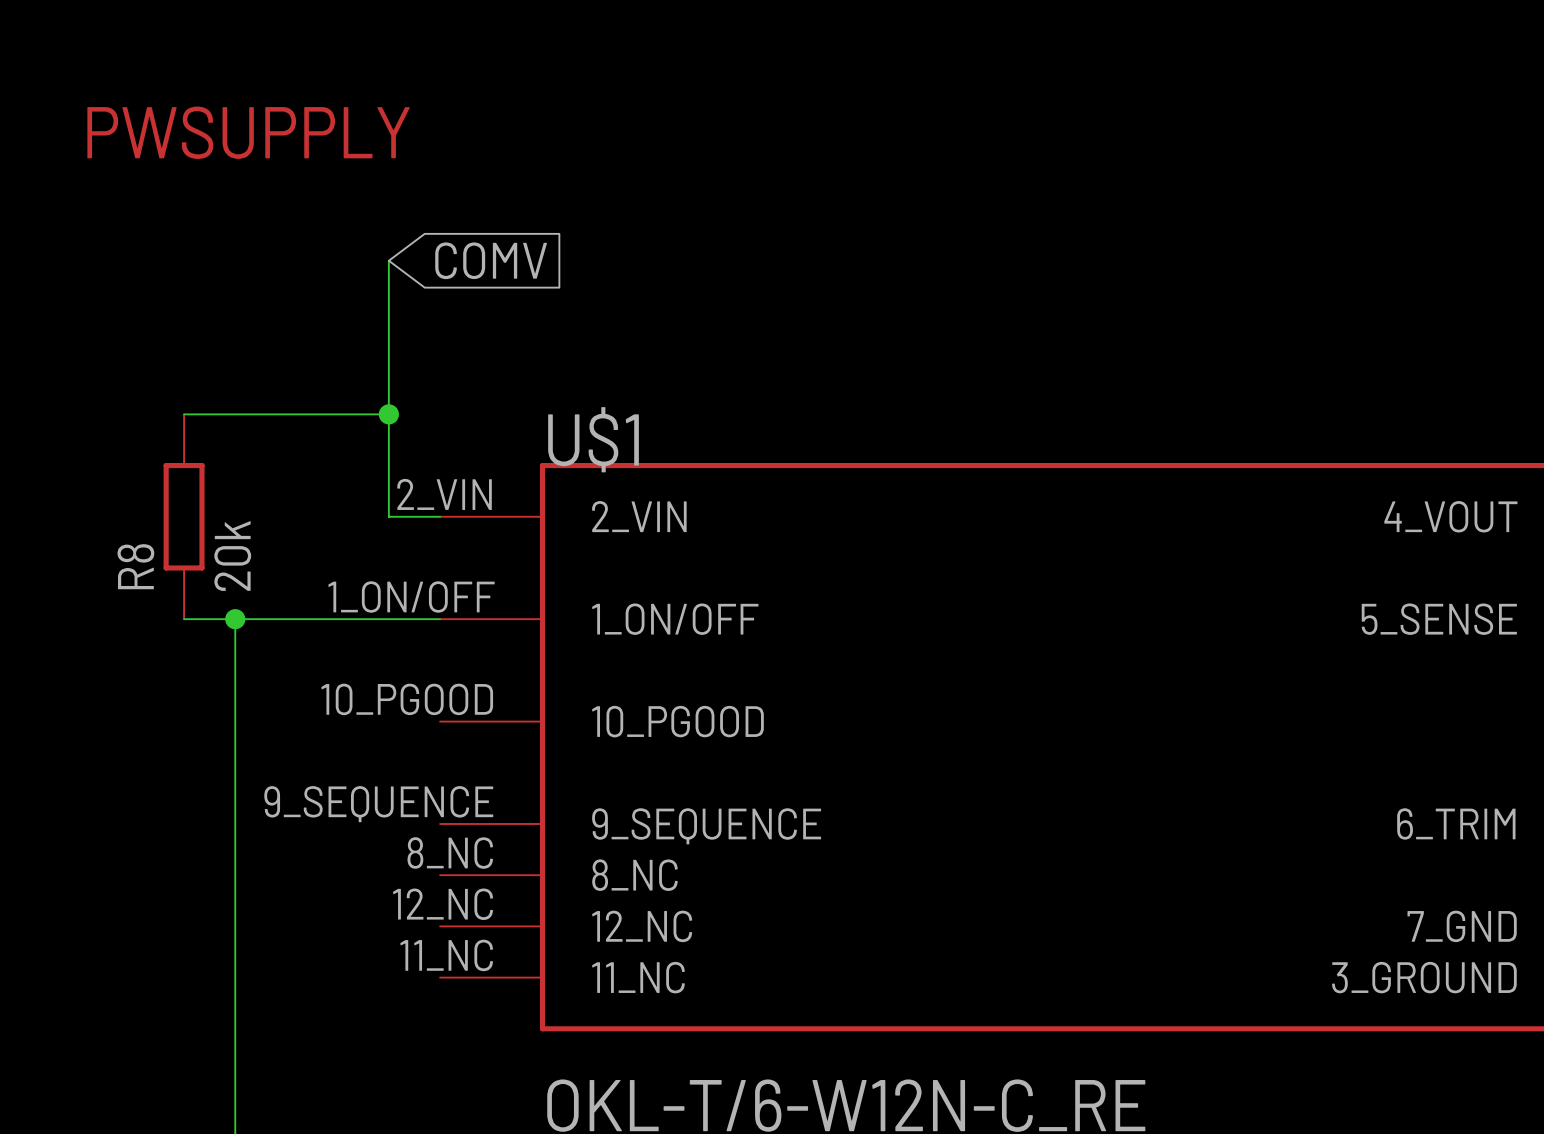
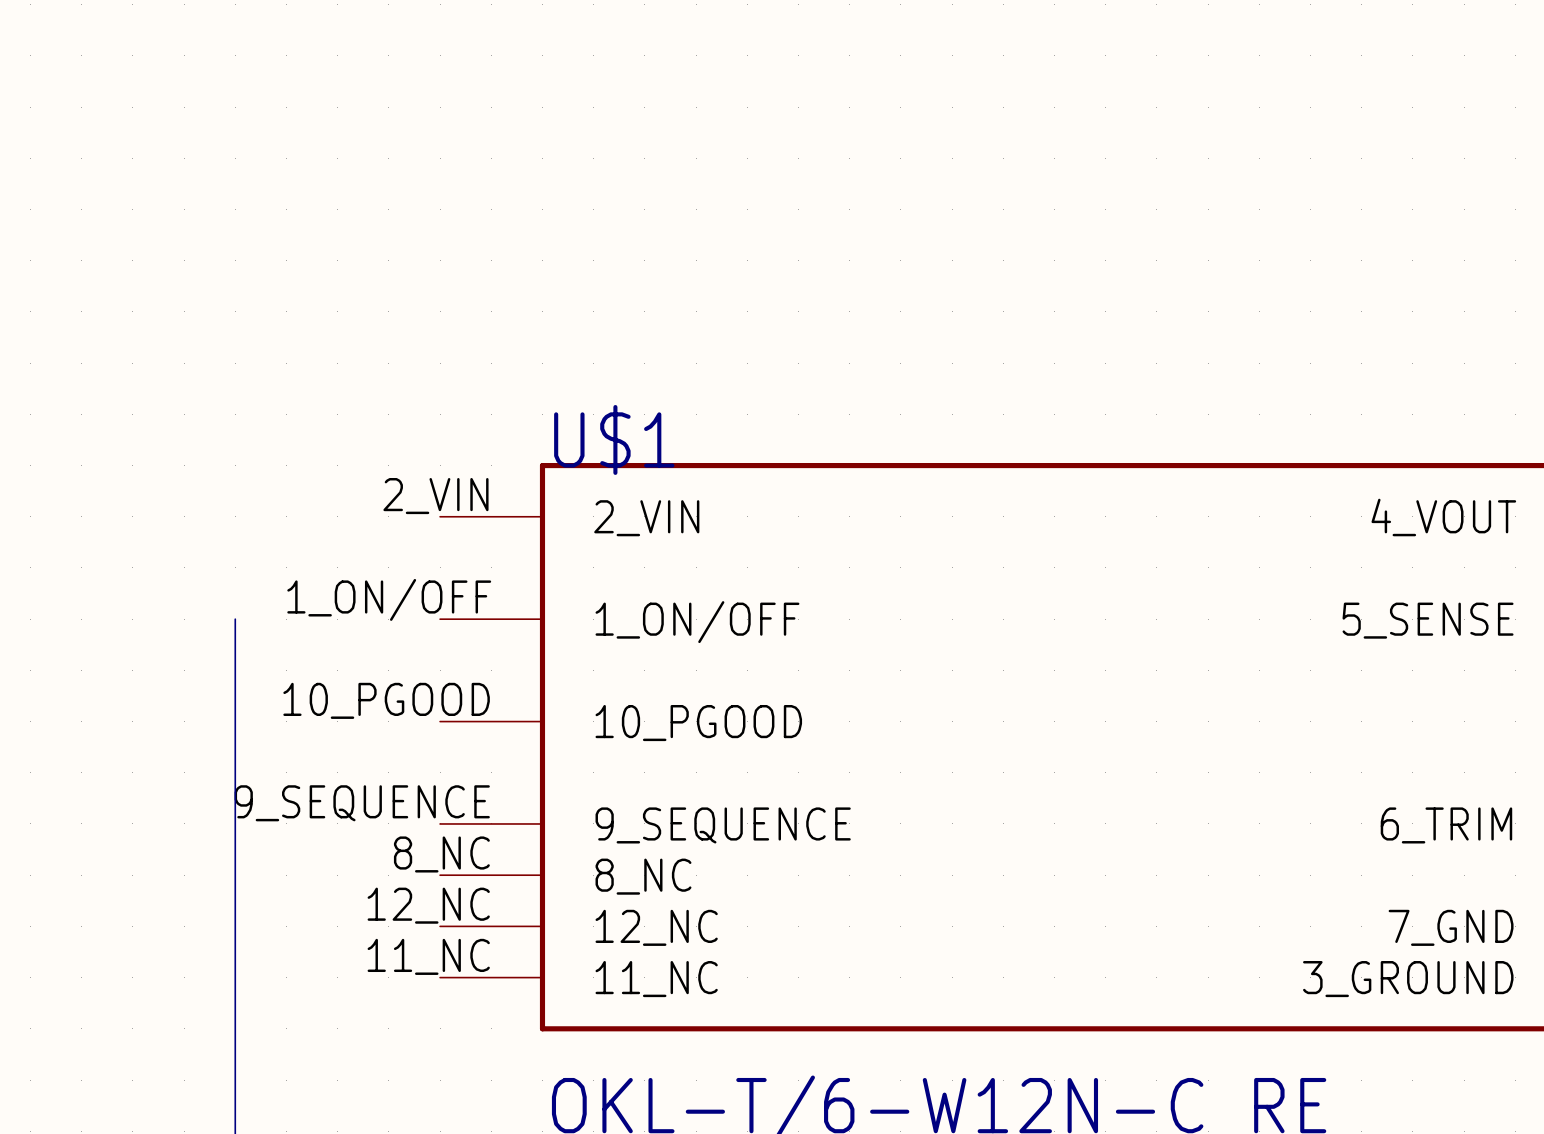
text: PWSUPPLY (248, 132) -> none
wire: (388, 260) (388, 516) (440, 516) -> none
global label: COMV (491, 260) -> none
wire: (184, 414) (388, 414) -> none
junction: (388, 414) -> none
R8: 20k (184, 516) -> none
wire: (184, 619) (440, 619) -> none
junction: (235, 619) -> none

